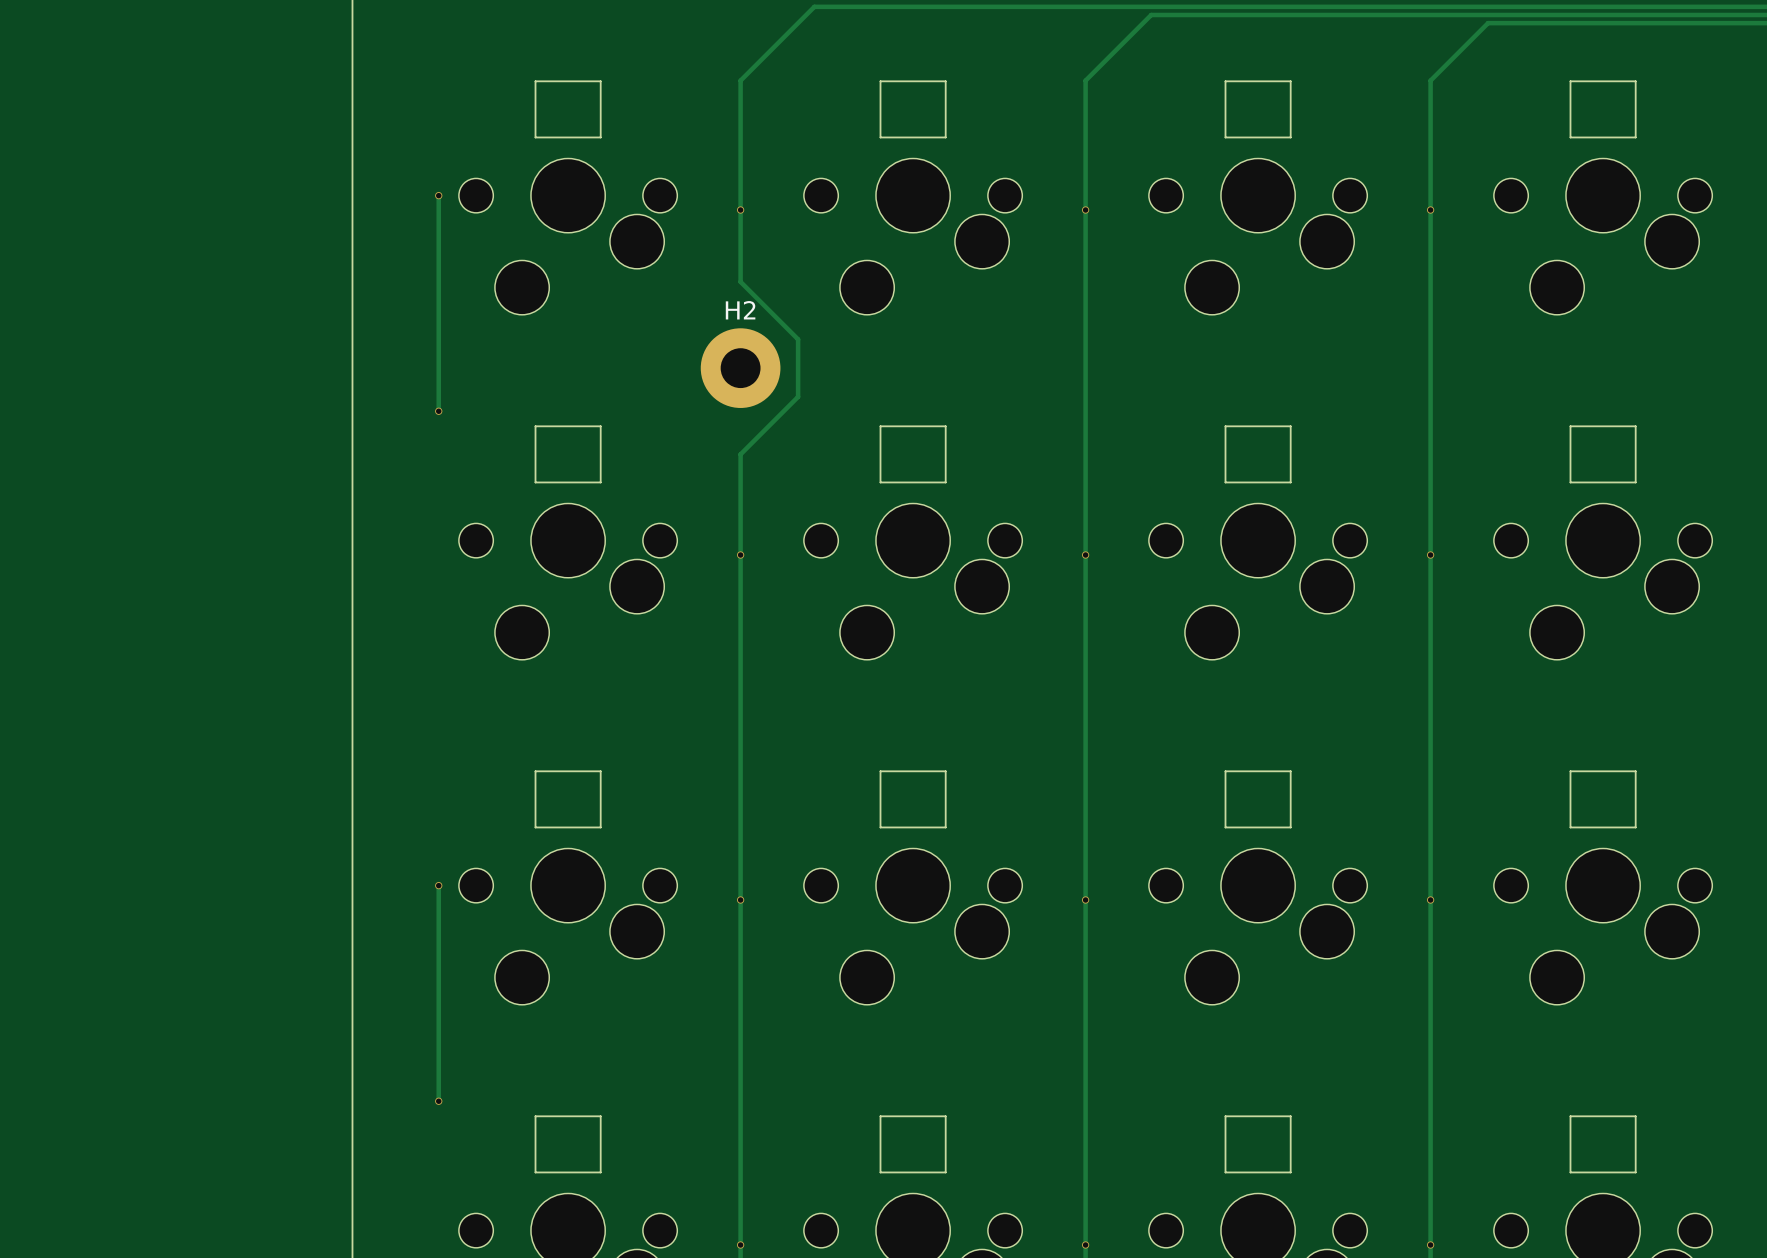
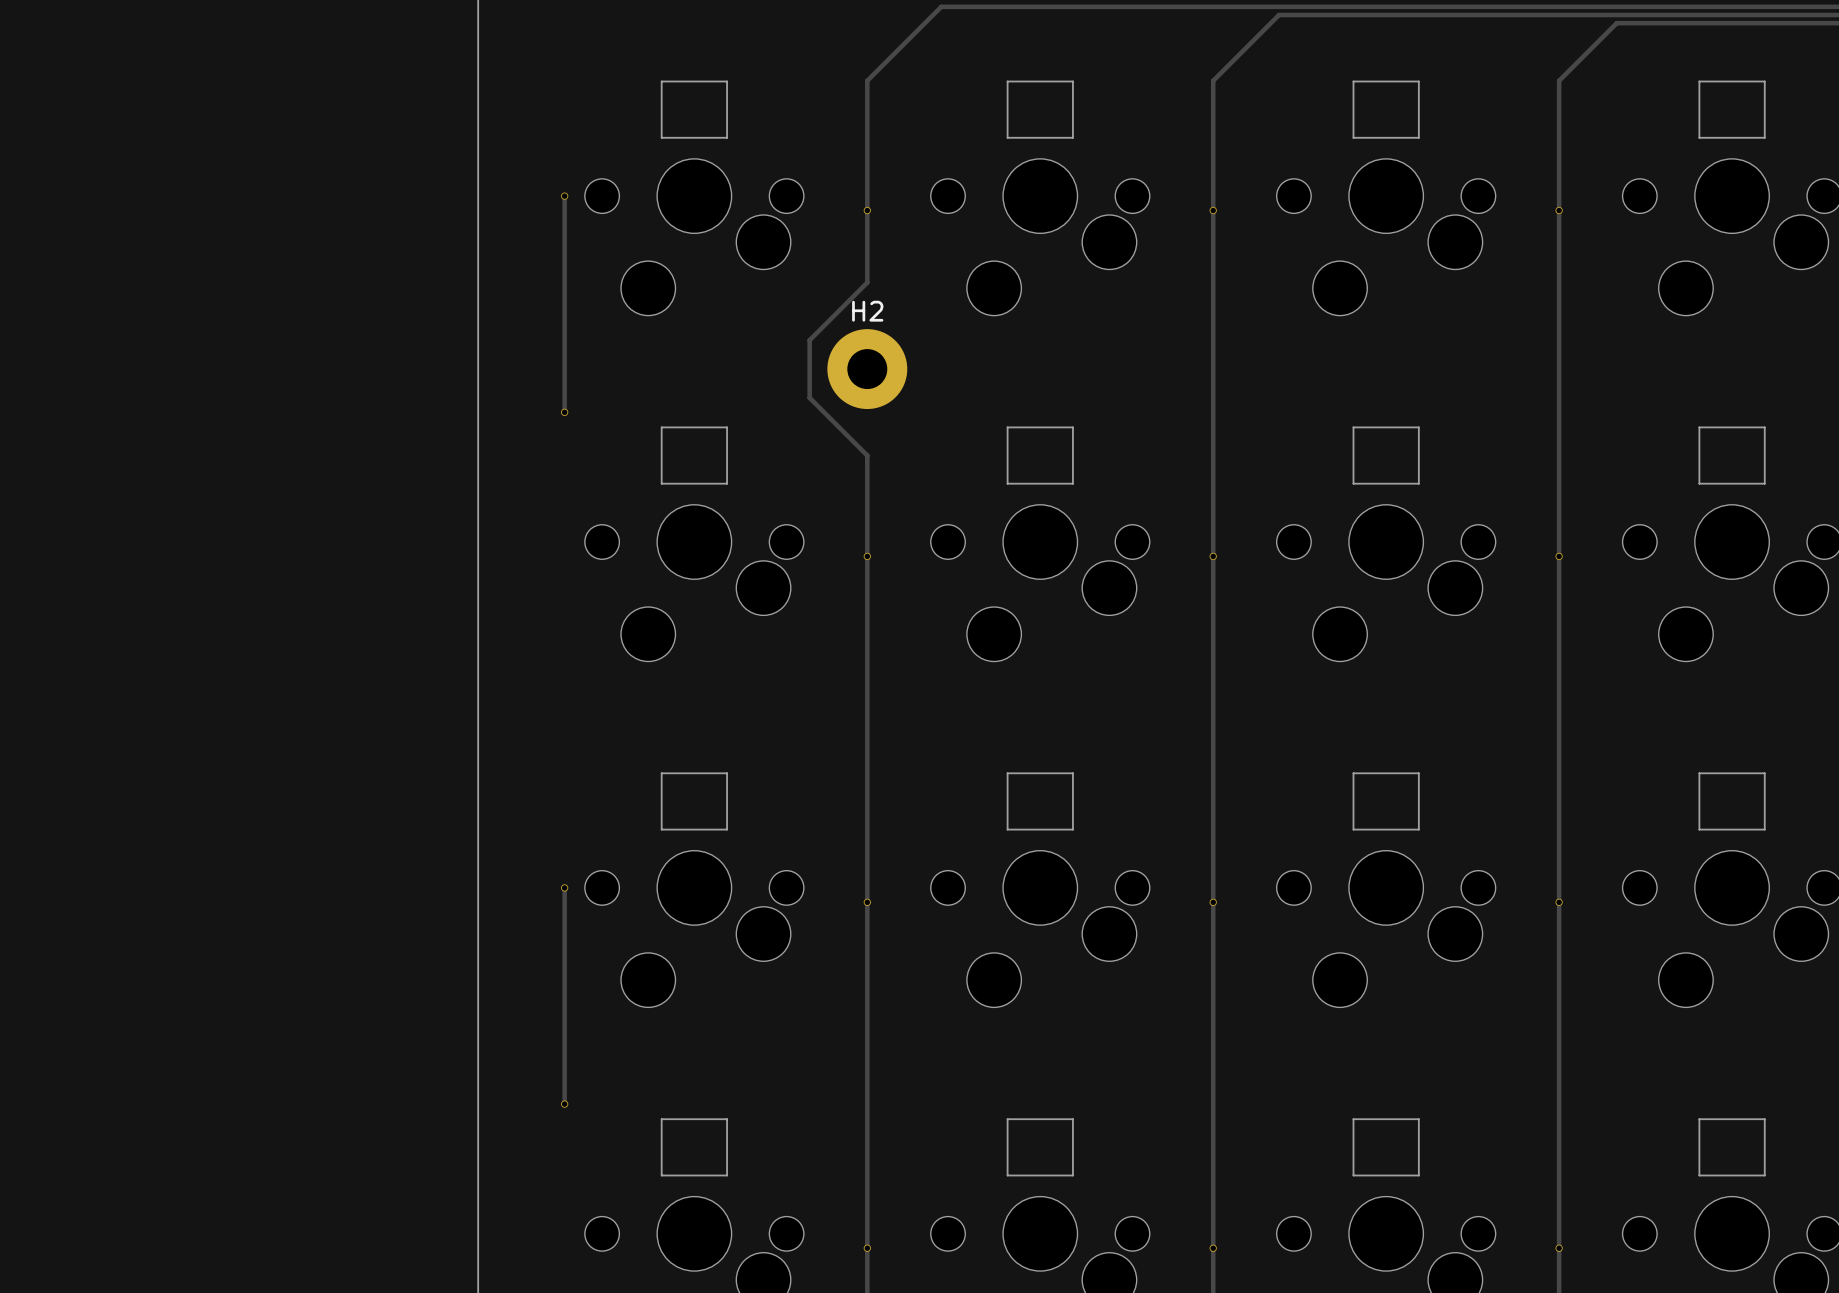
track: (740, 281) (798, 339) (798, 396) (740, 454) -> (867, 282) (809, 340) (809, 397) (867, 455)

